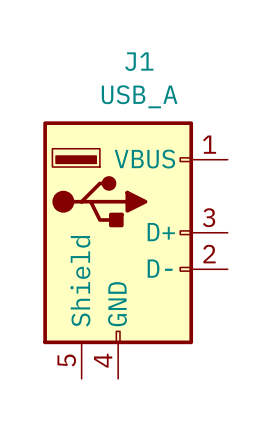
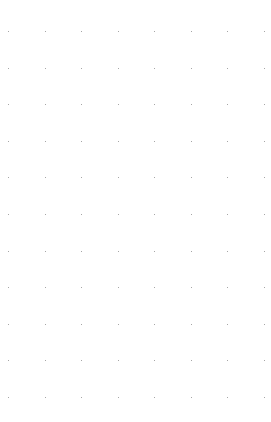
J1: USB_A (135, 250) -> none

